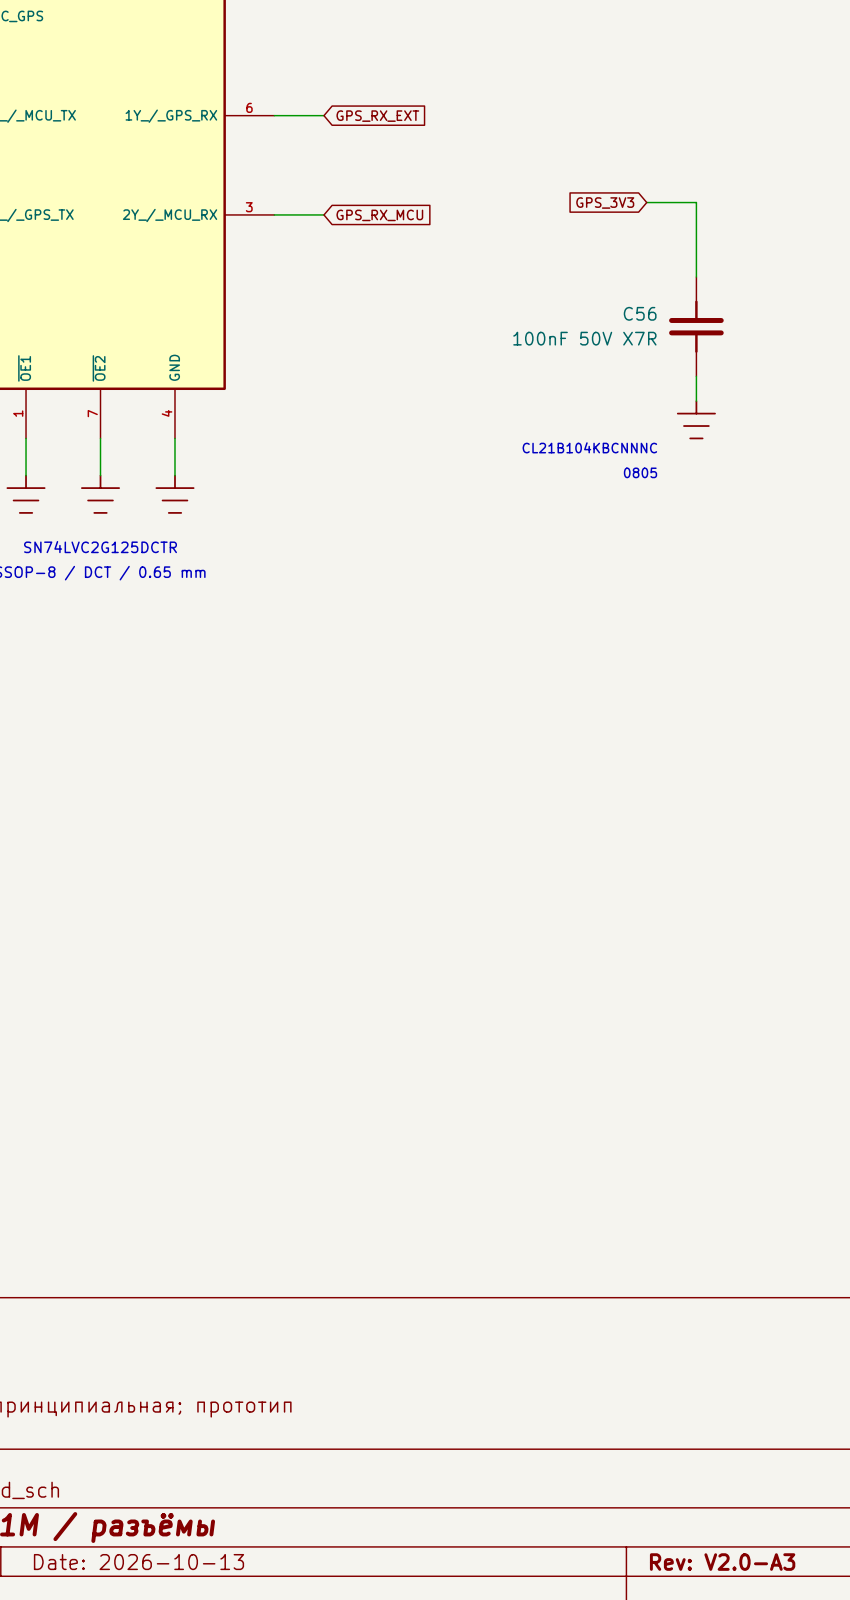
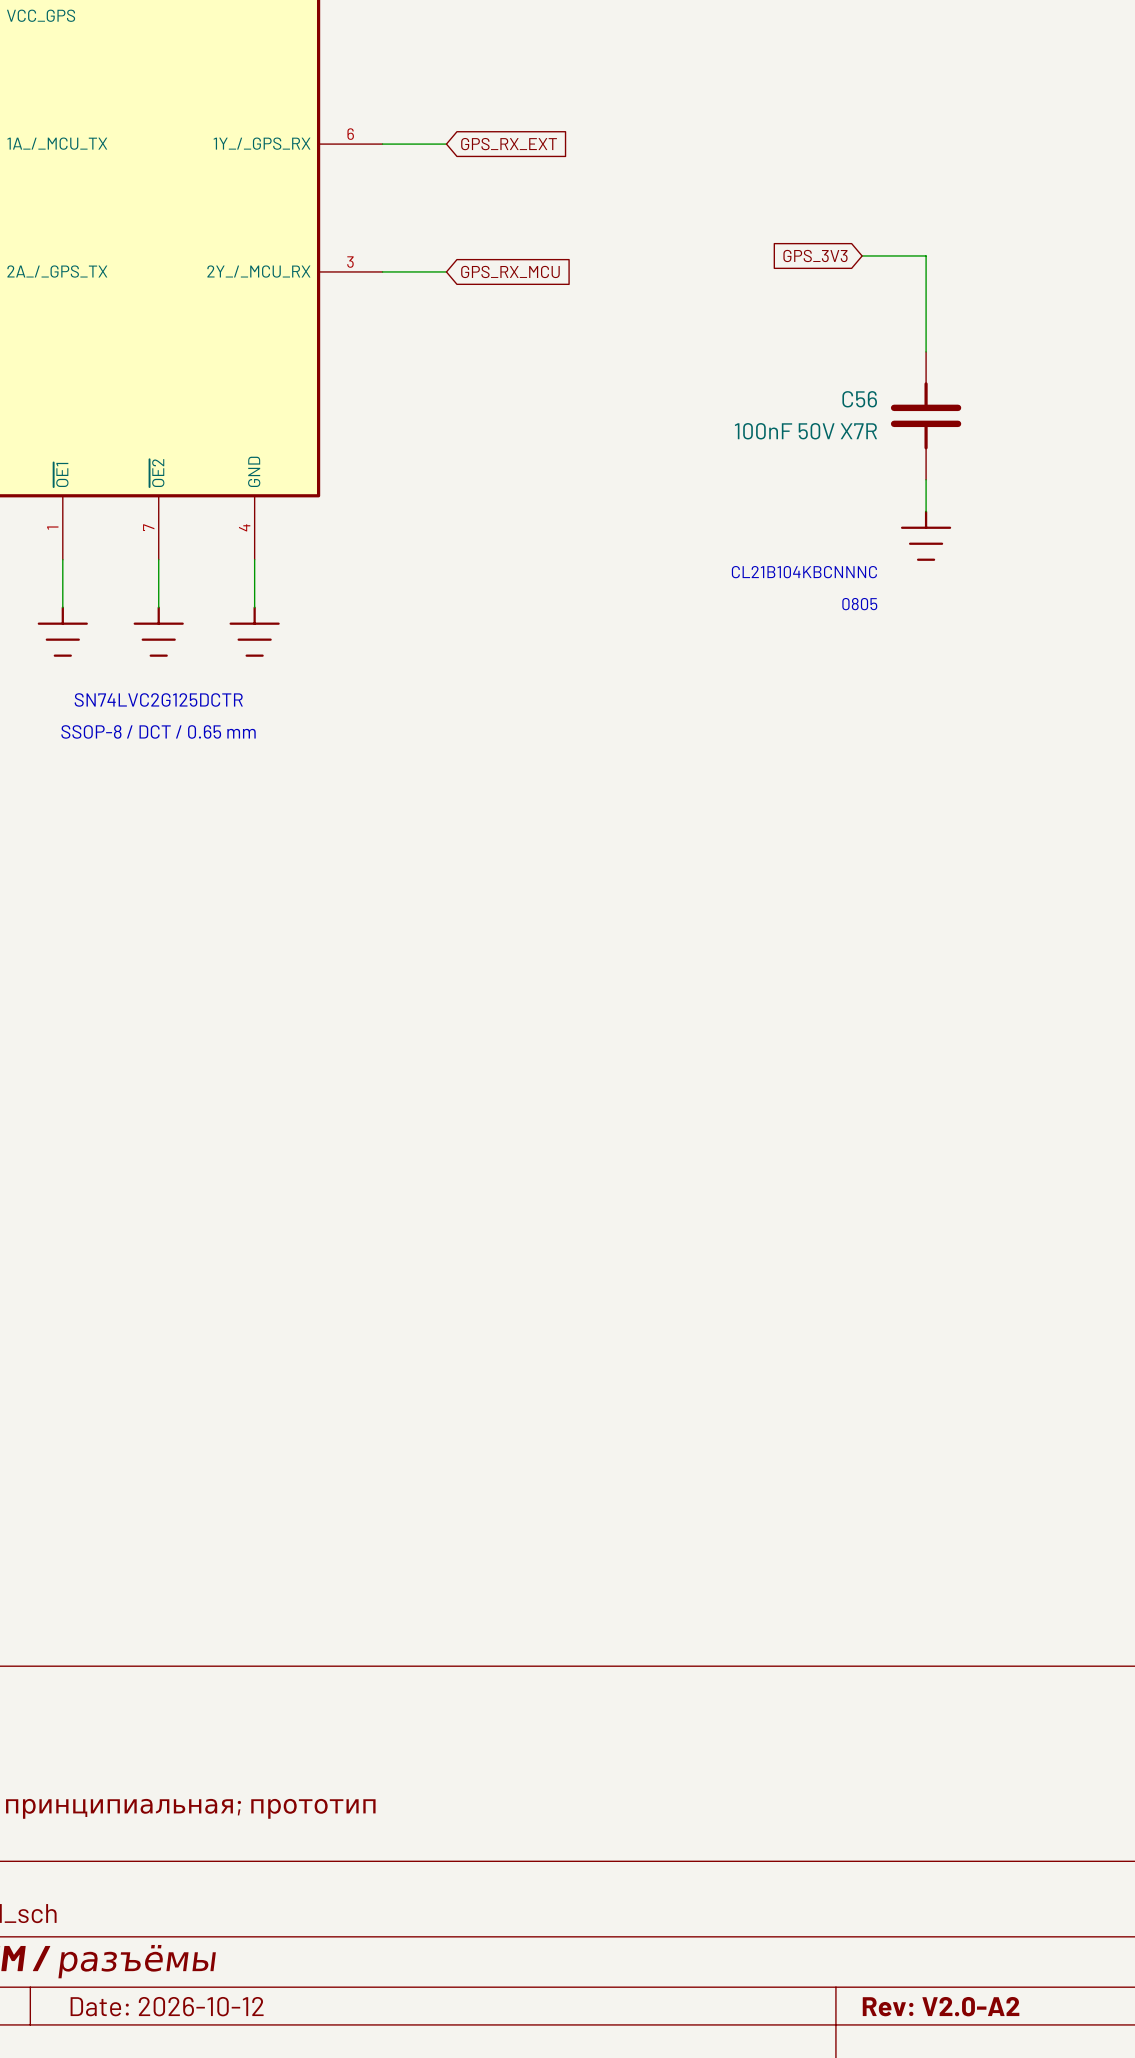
title block: Date: 2026-10-13 (138, 1562) -> Date: 2026-10-12 (167, 2006)
title block: Rev: V2.0-A3 (722, 1562) -> Rev: V2.0-A2 (941, 2006)

